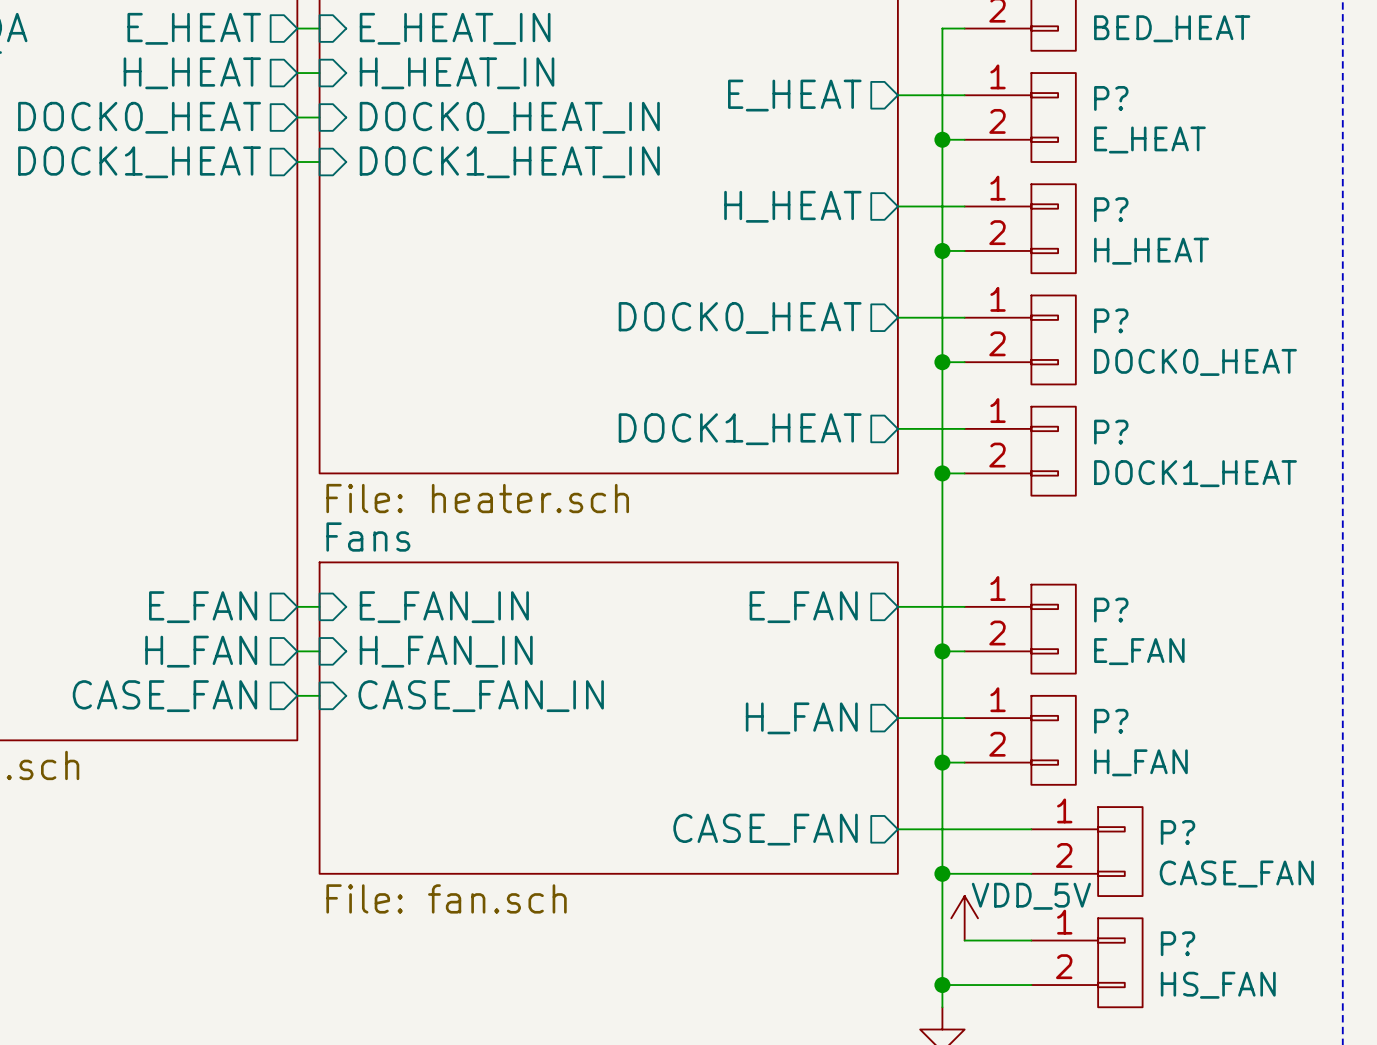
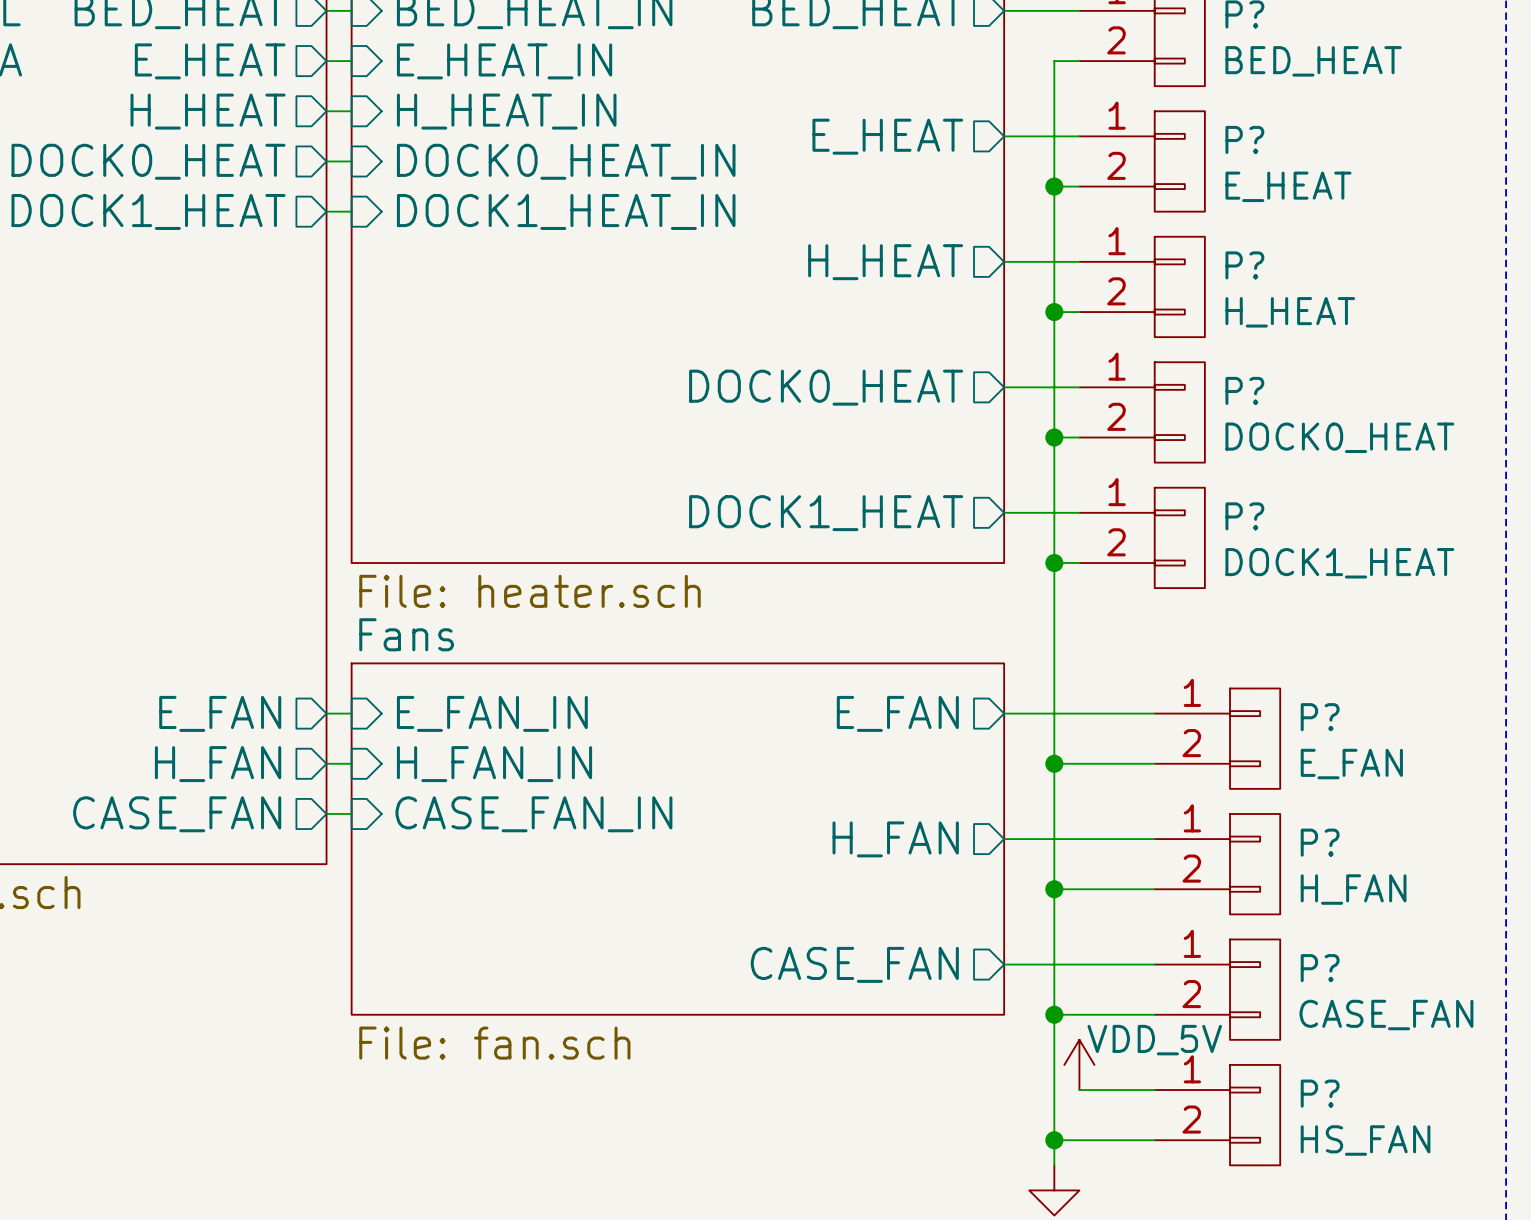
P? position: (1020, 629) -> (1217, 738)
P? position: (1020, 740) -> (1217, 864)

